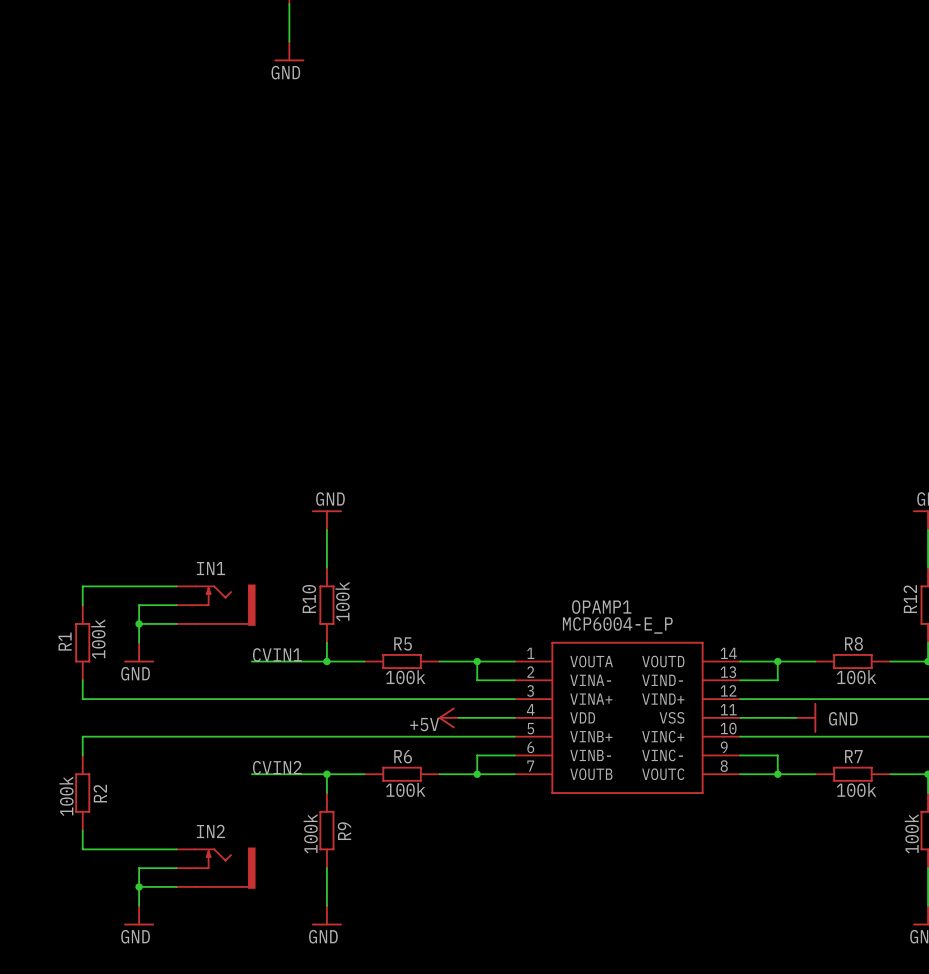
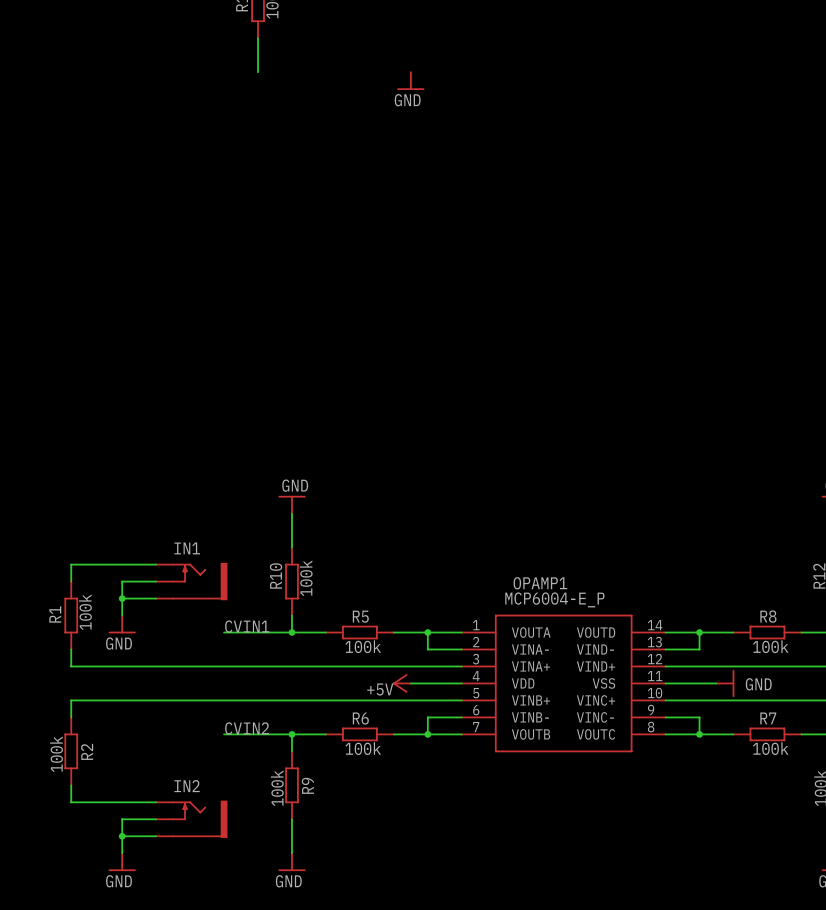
power symbol position: GND (289, 51) -> GND (410, 81)

